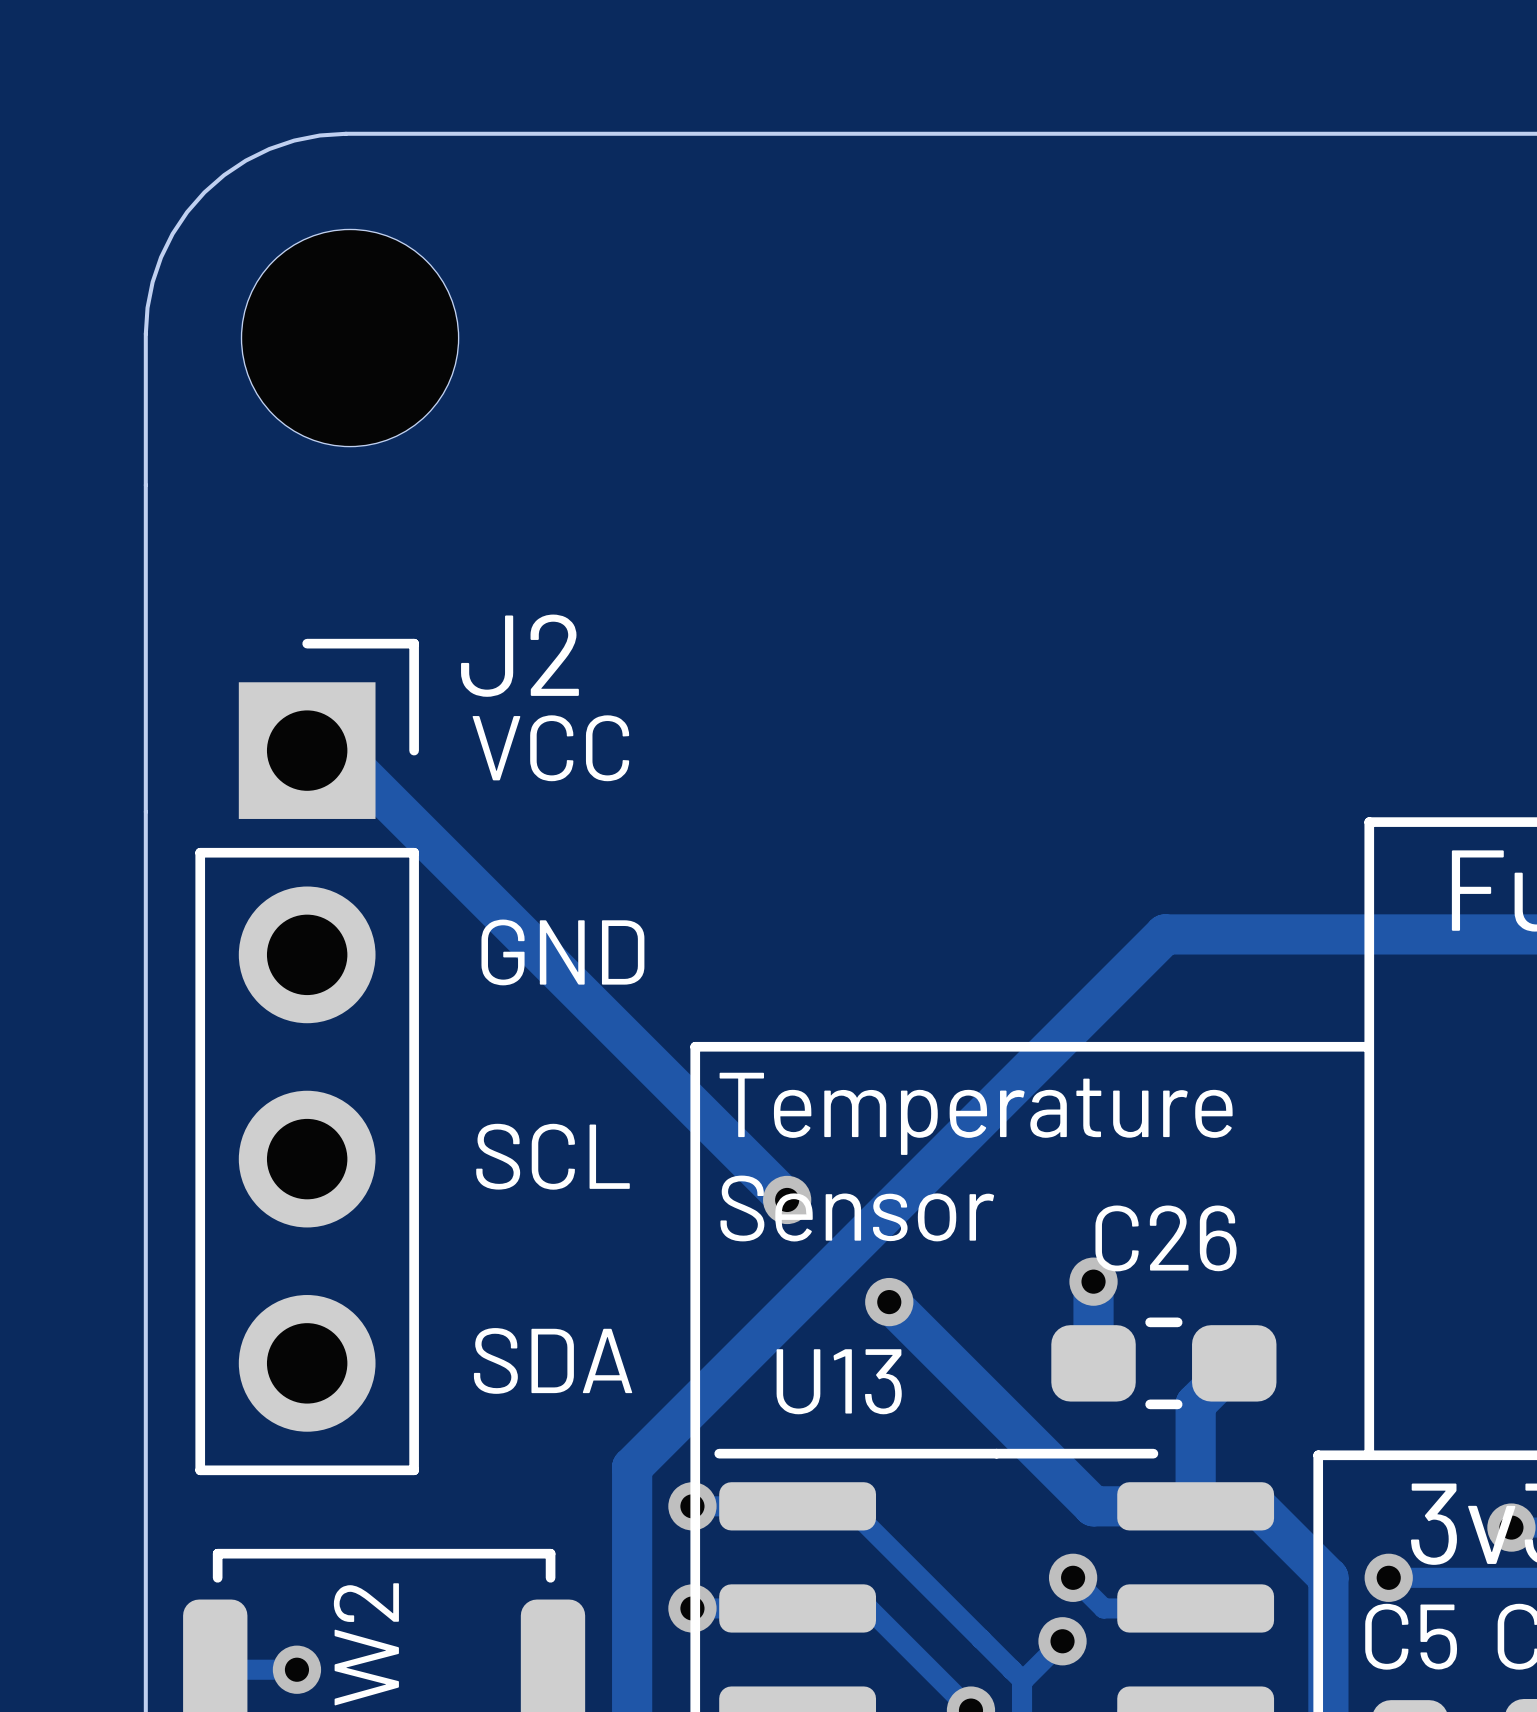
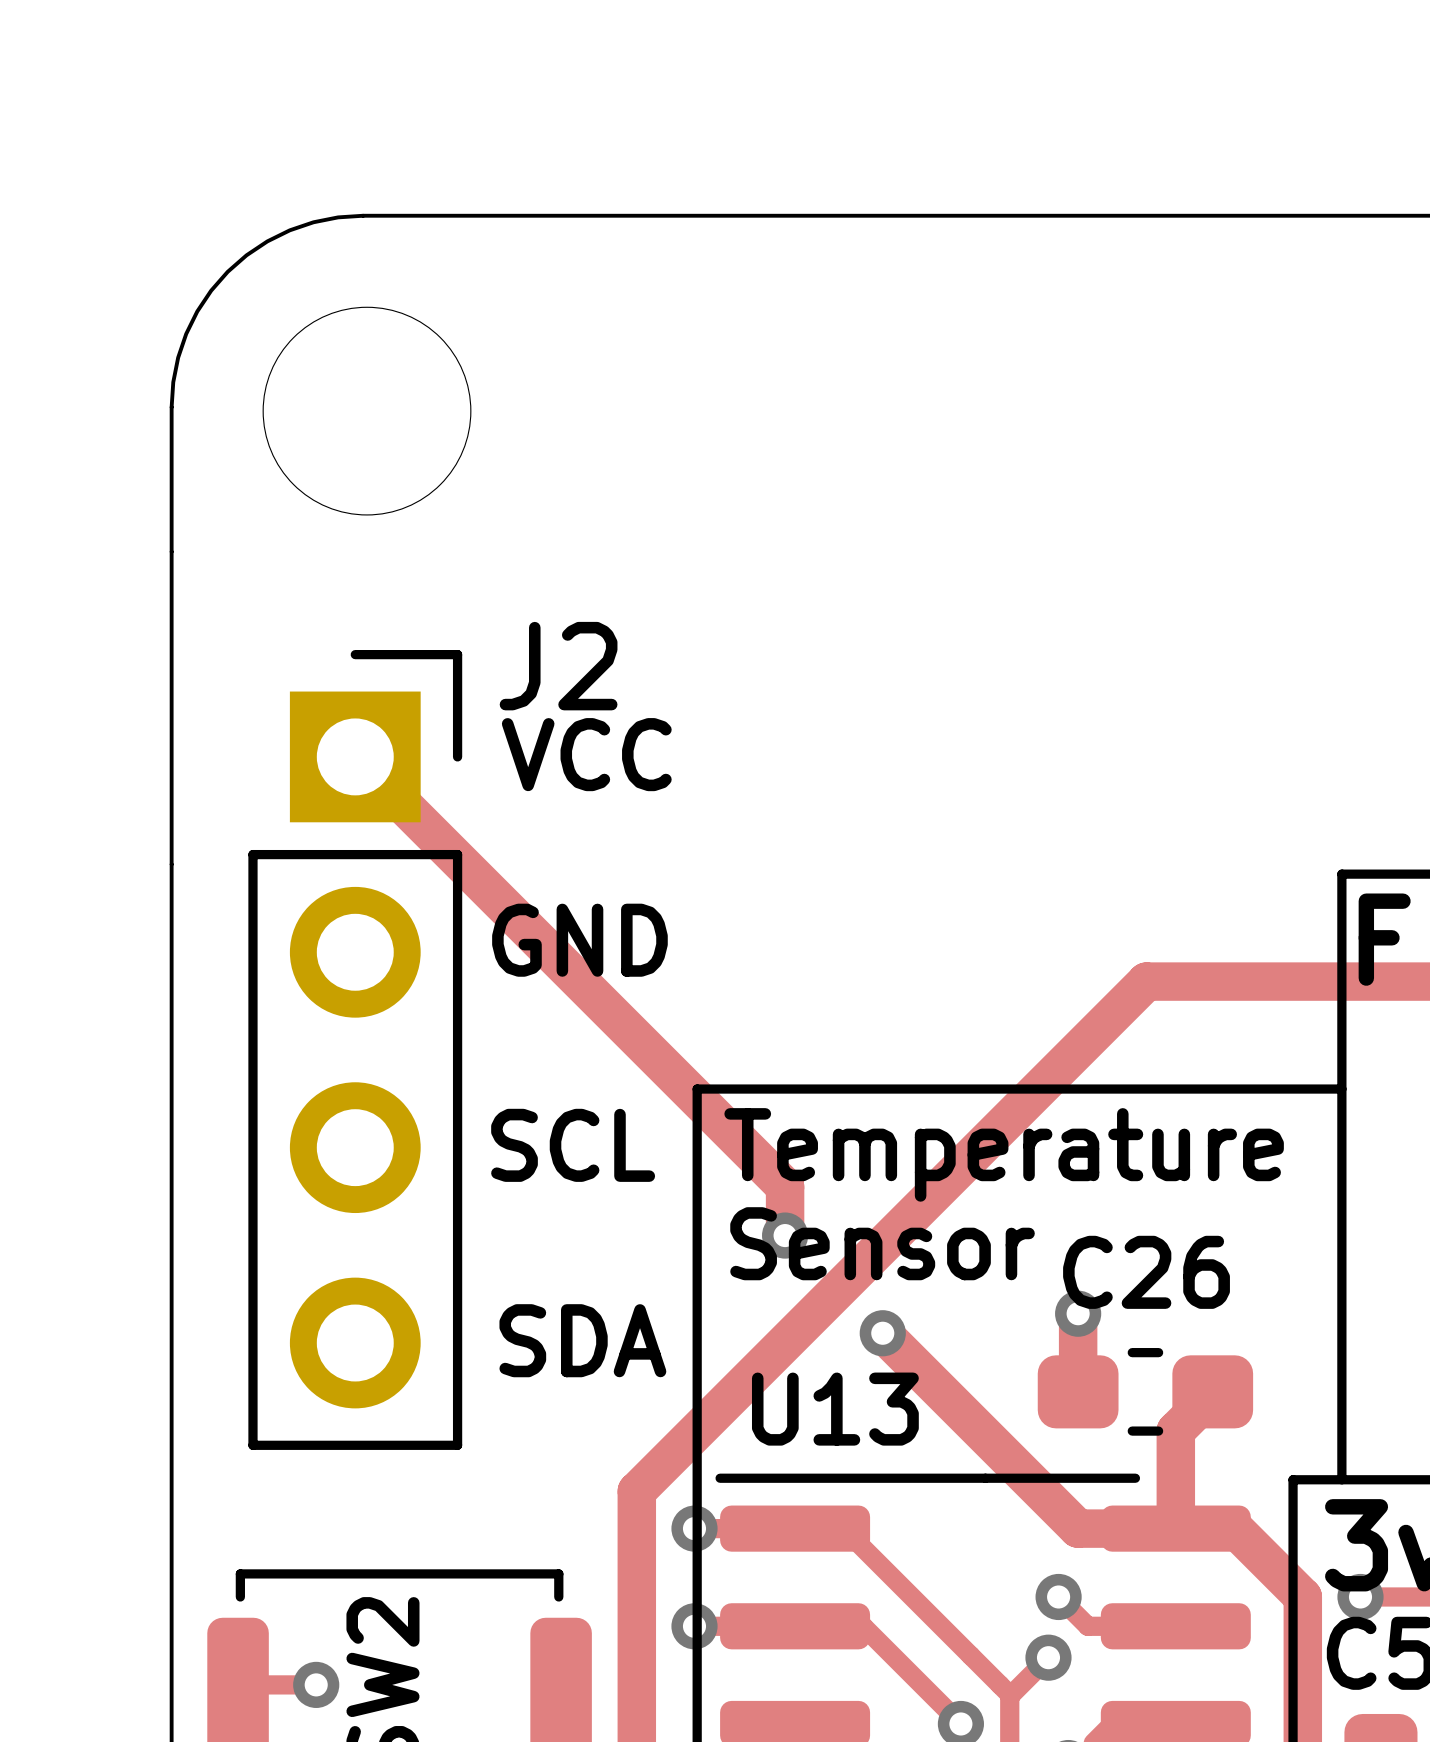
text position: VCC (550, 748) -> VCC (586, 754)
track: (307, 750) (337, 750) (787, 1199) -> (355, 756) (785, 1186) (785, 1235)
text position: GND (562, 952) -> GND (579, 940)
J2 position: (307, 1056) -> (355, 1049)
text position: SCL (553, 1156) -> SCL (573, 1145)
text position: SDA (553, 1360) -> SDA (582, 1340)

